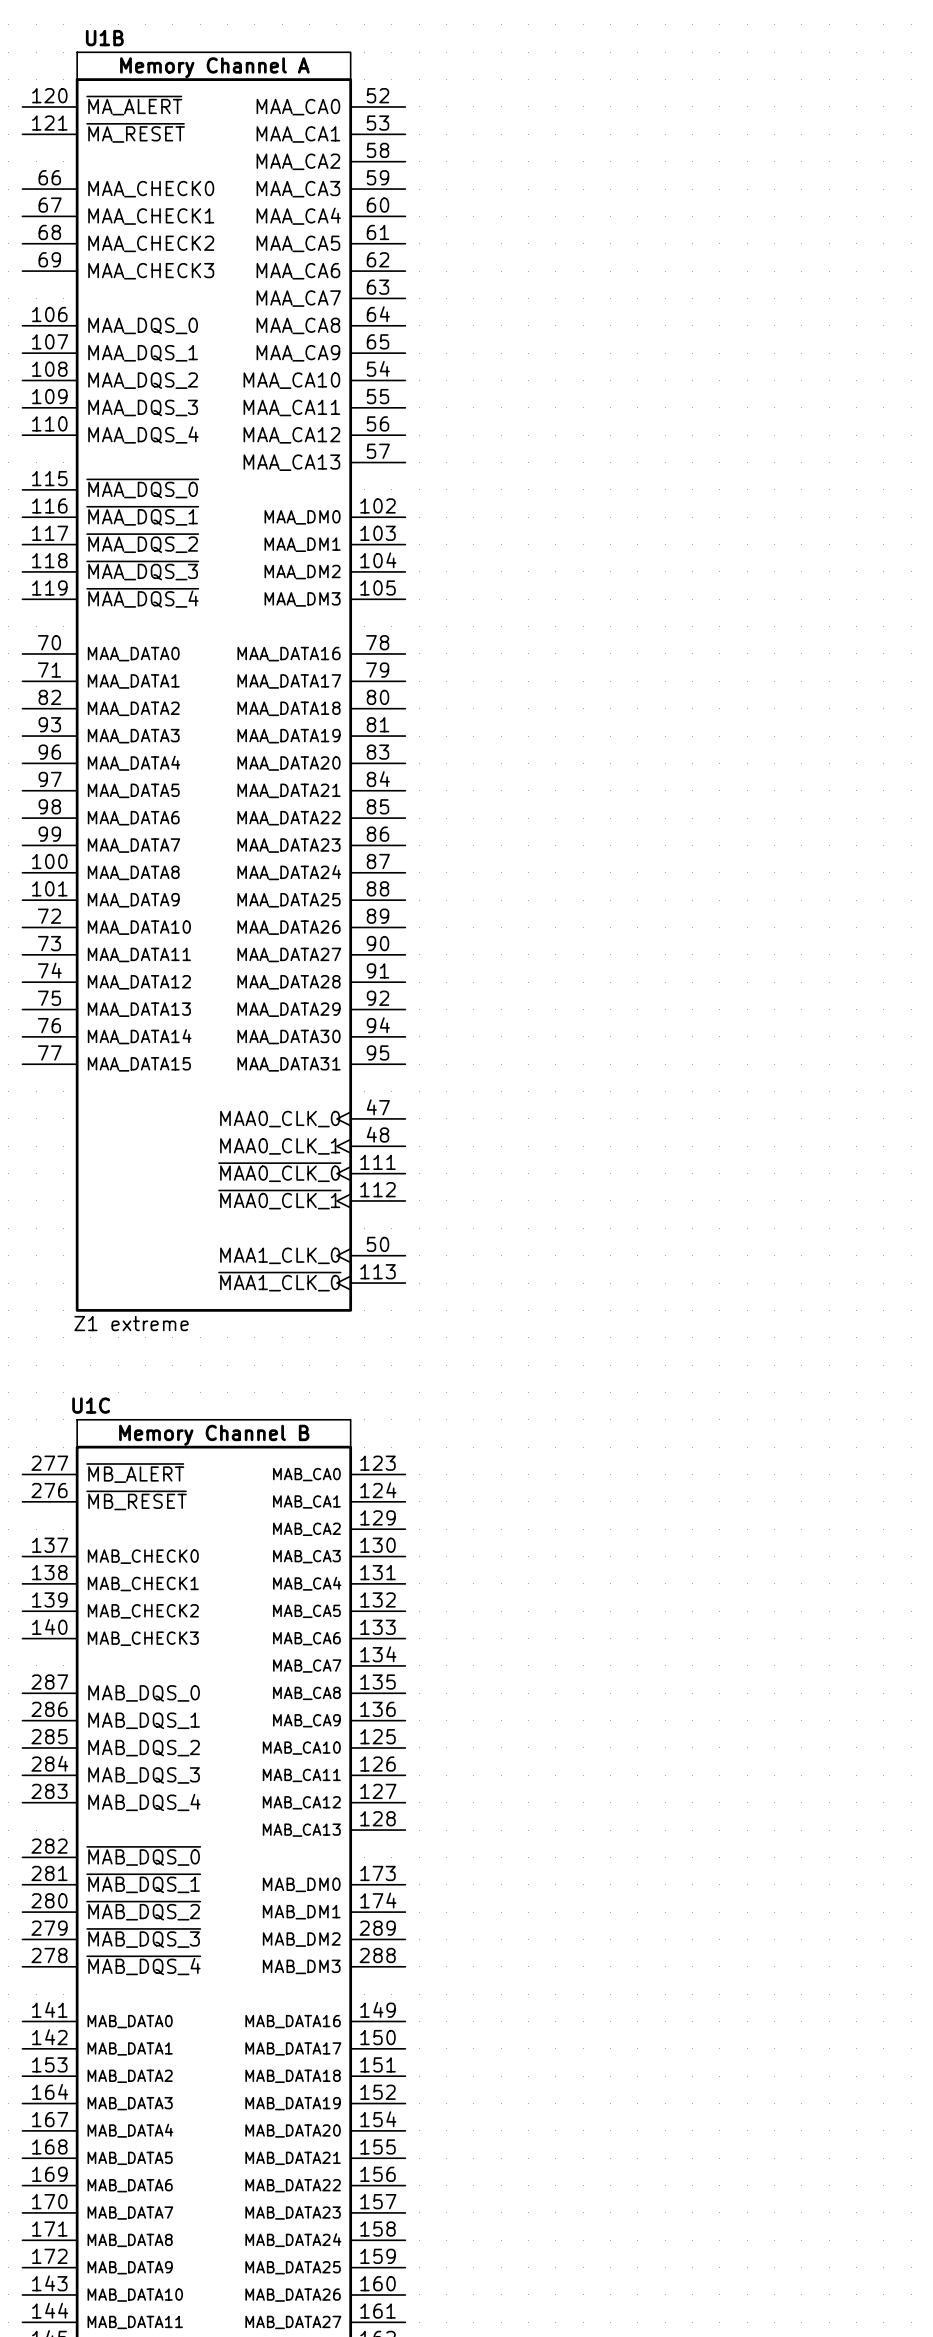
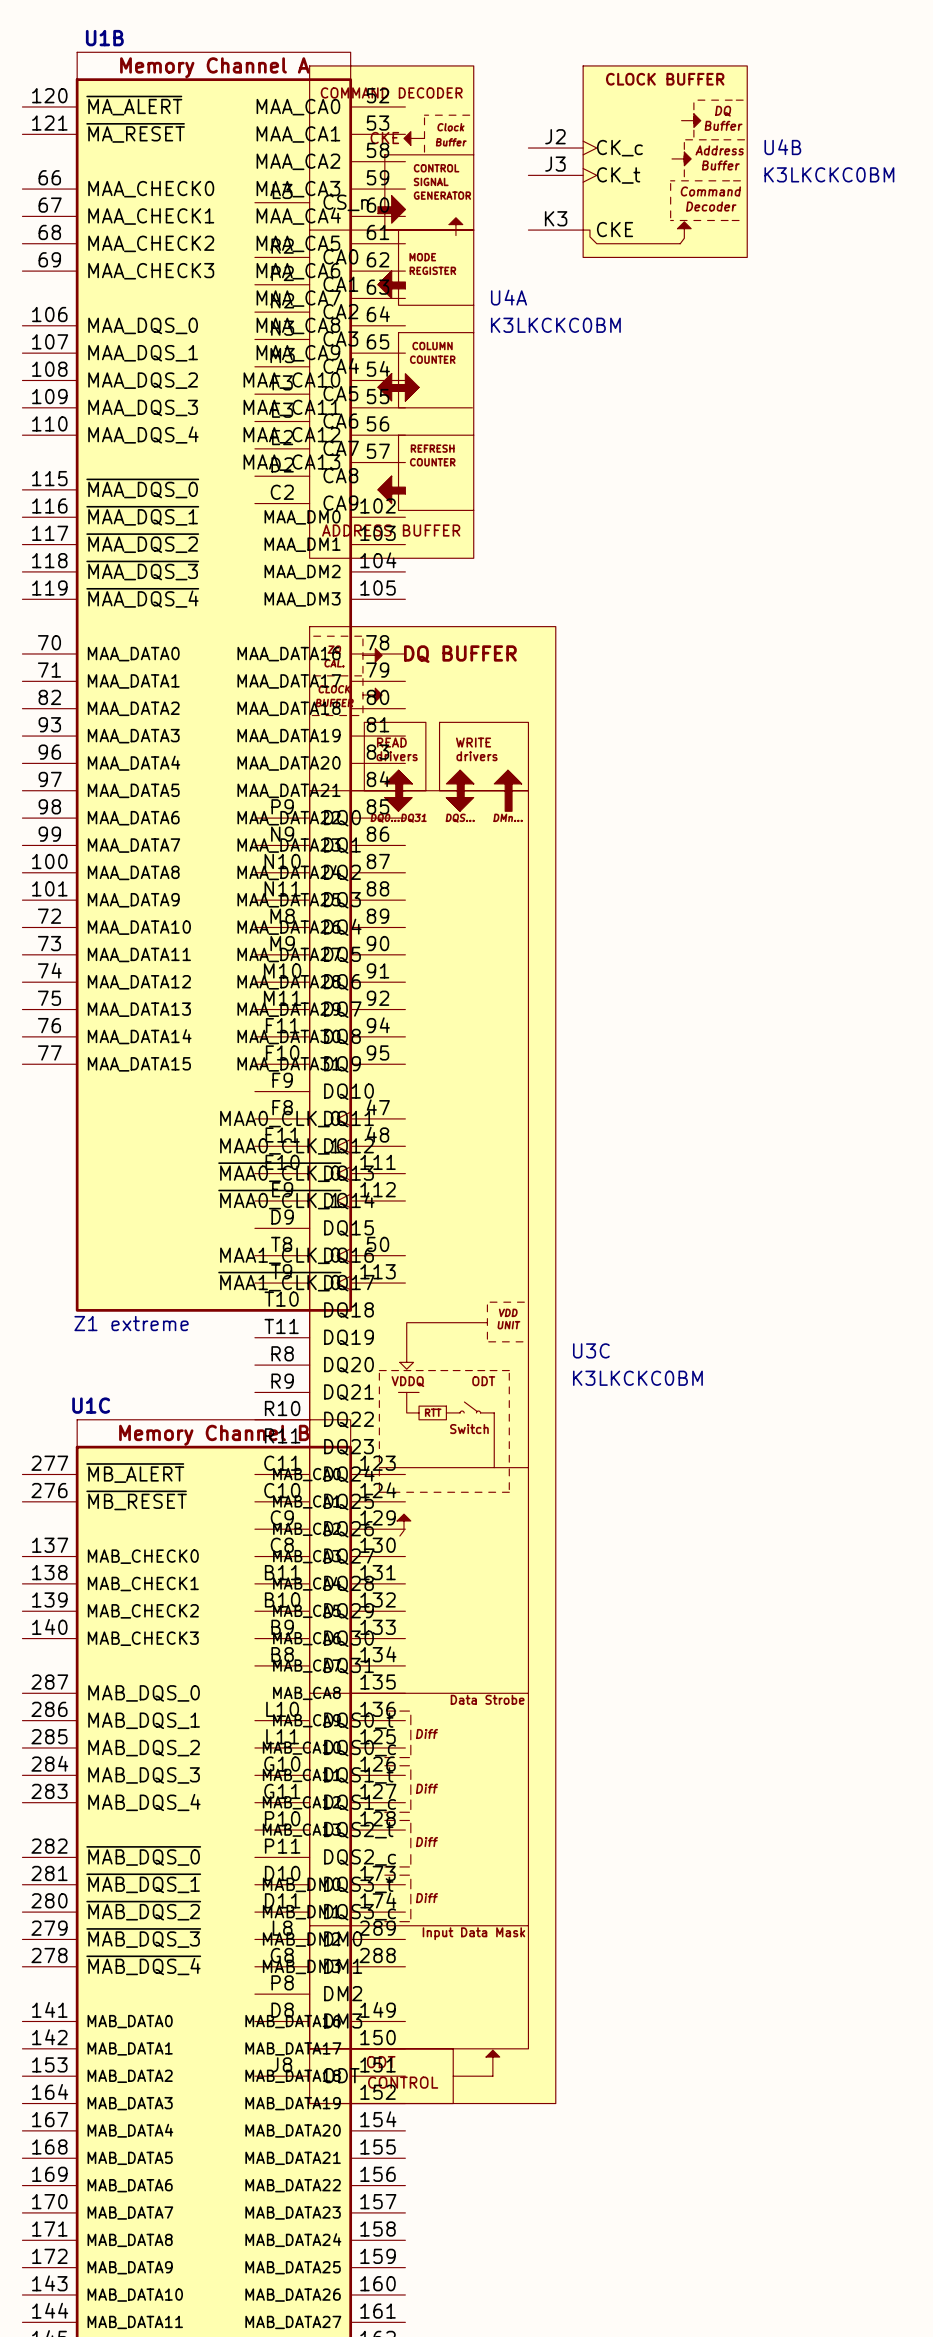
U4B: none -> K3LKCKC0BM (637, 161)
U4A: none -> K3LKCKC0BM (364, 312)
U3C: none -> K3LKCKC0BM (405, 1365)

